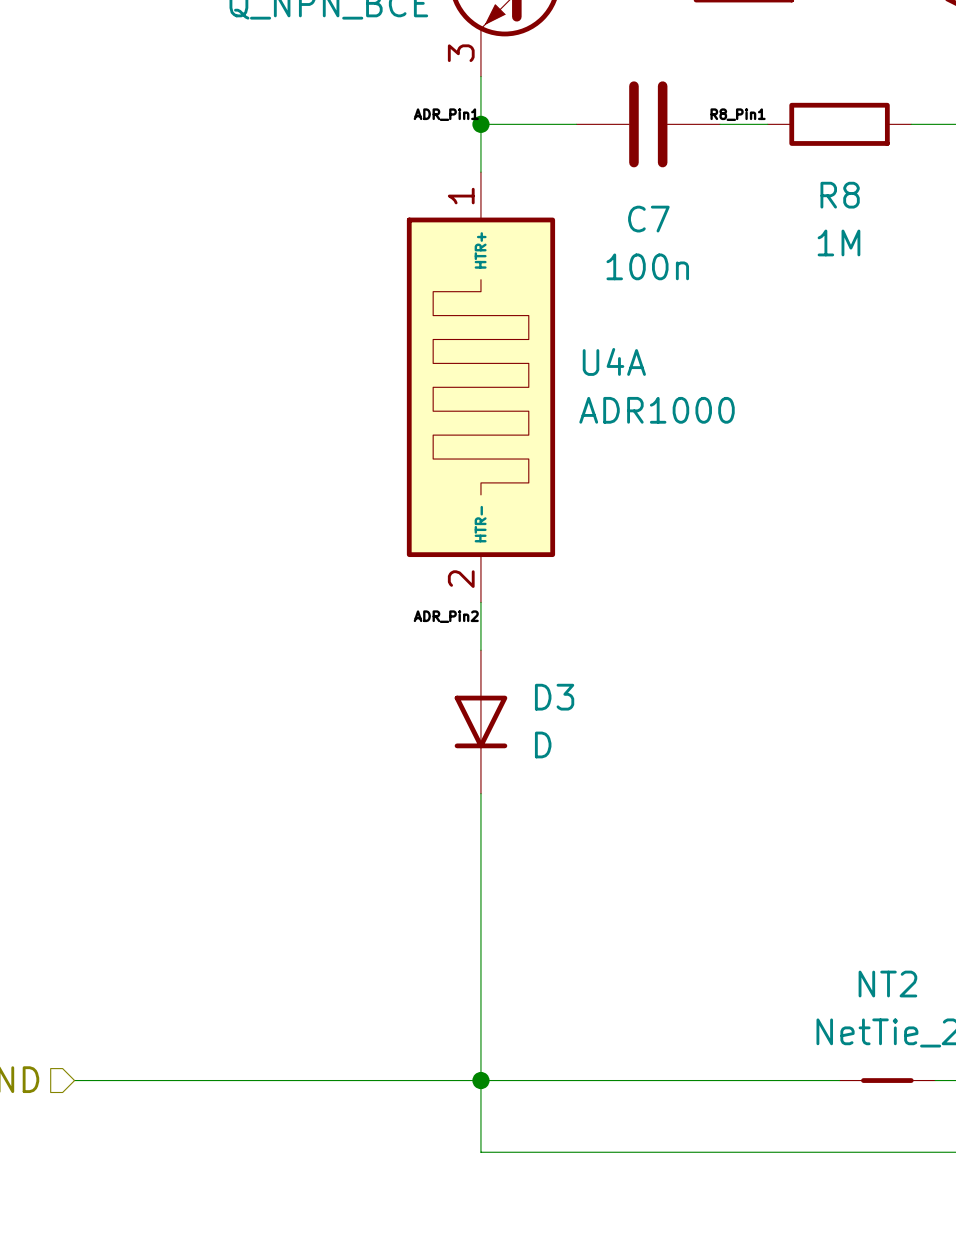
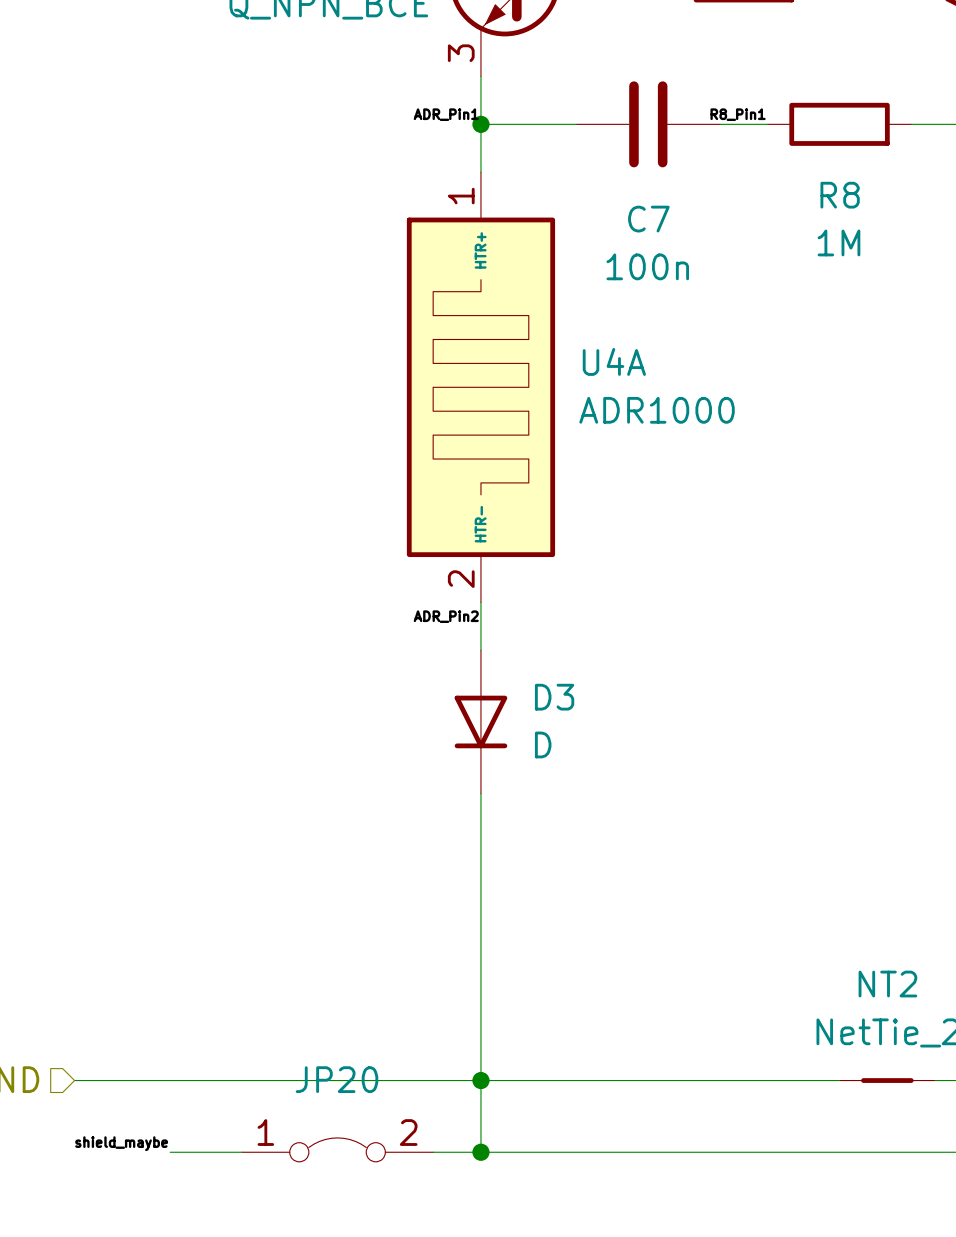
label: none -> shield_maybe (121, 1143)
JP20: none -> (337, 1149)
wire: none -> (170, 1152) (241, 1152)
wire: none -> (433, 1152) (480, 1152)
junction: none -> (480, 1152)

